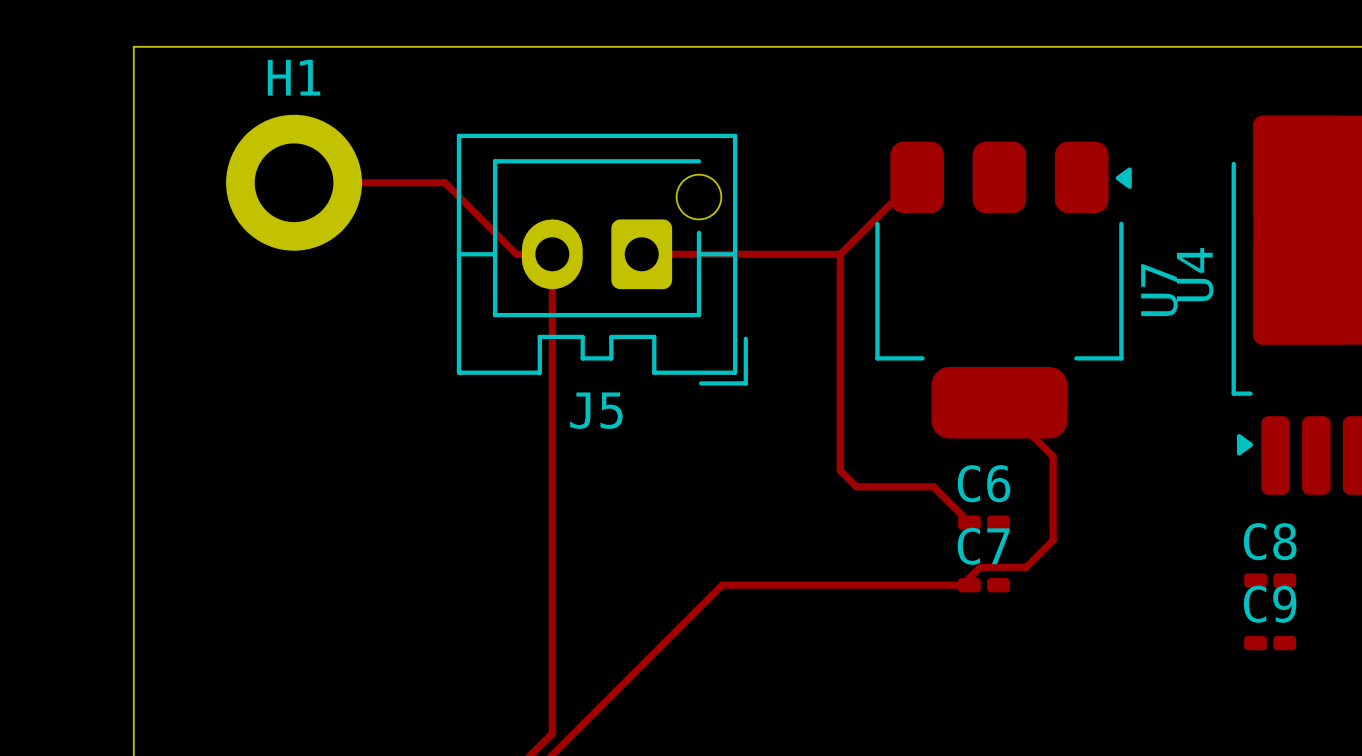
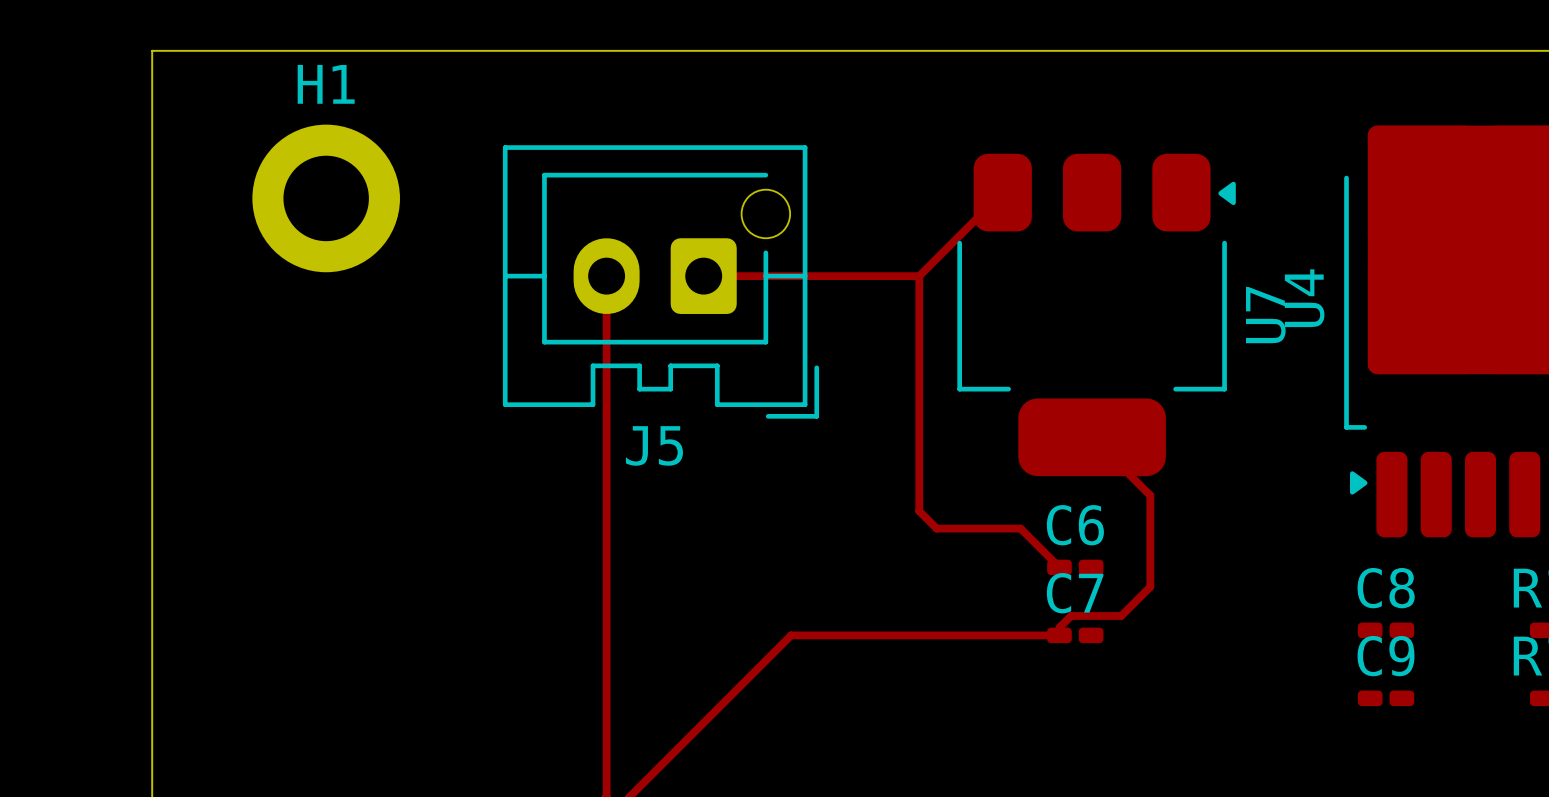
top track: (294, 182) (445, 182) (516, 254) (552, 254) -> none

